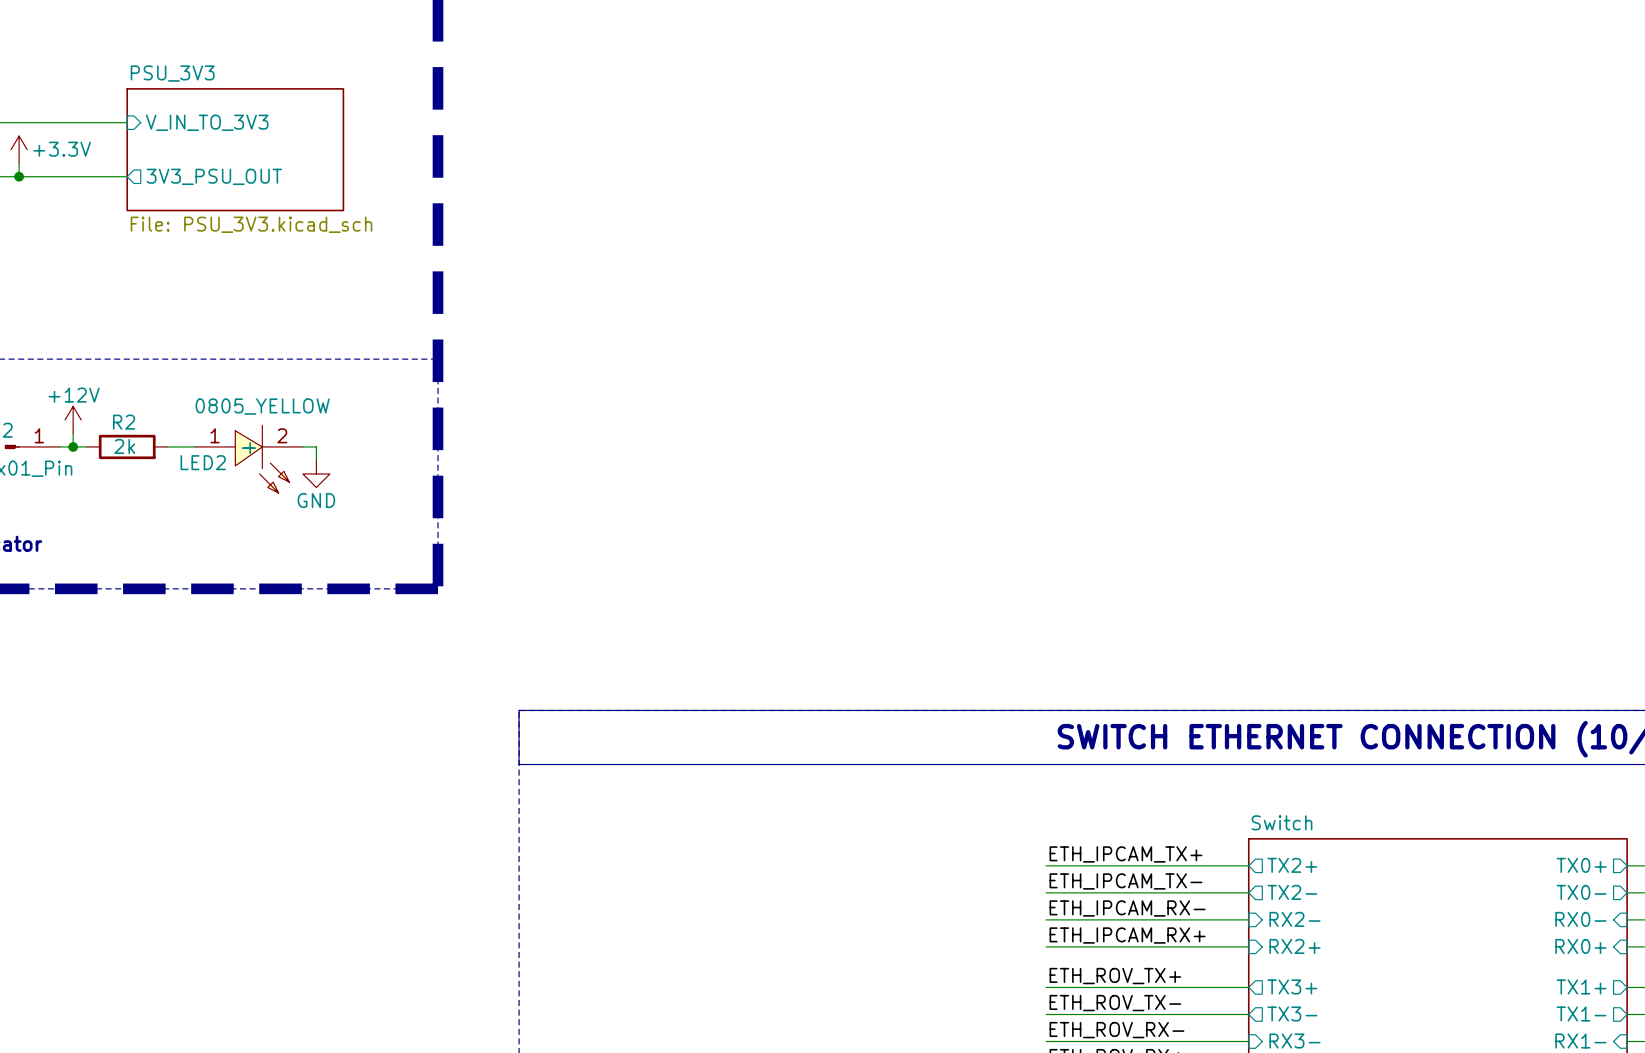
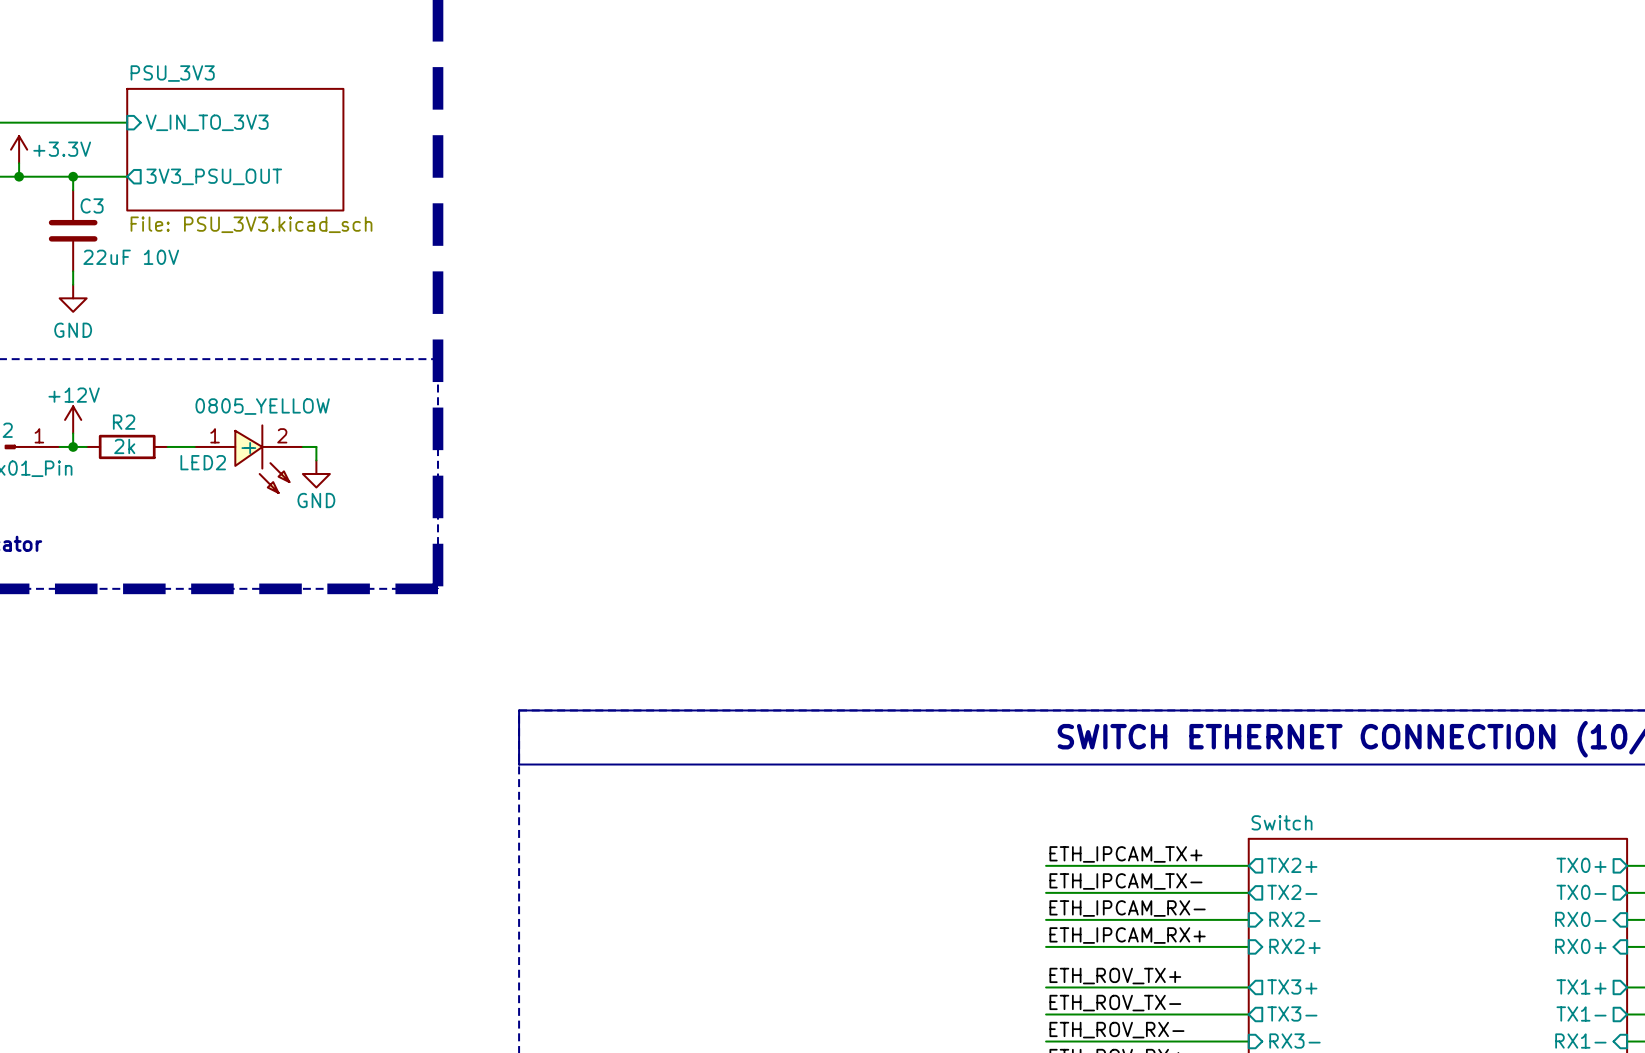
wire: none -> (73, 176) (73, 190)
junction: none -> (73, 176)
C3: none -> 22uF 10V (73, 230)
wire: none -> (73, 271) (73, 284)
power symbol: none -> GND (73, 298)

